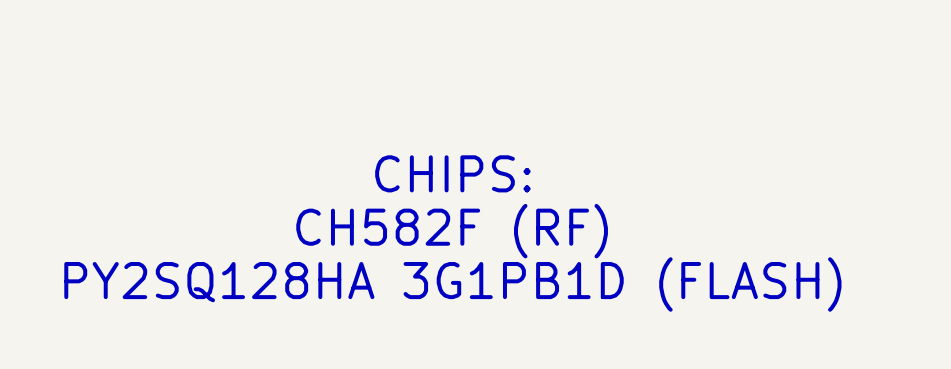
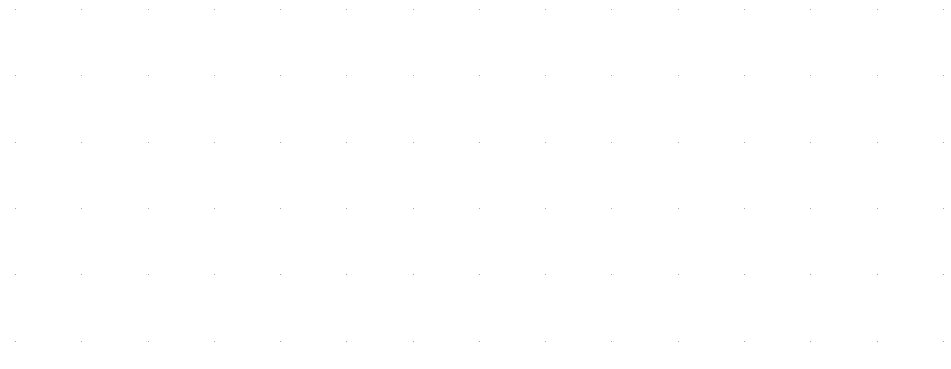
text: CHIPS: (452, 173) -> none
text: CH582F (RF) (452, 231) -> none
text: PY2SQ128HA 3G1PB1D (FLASH) (452, 284) -> none

